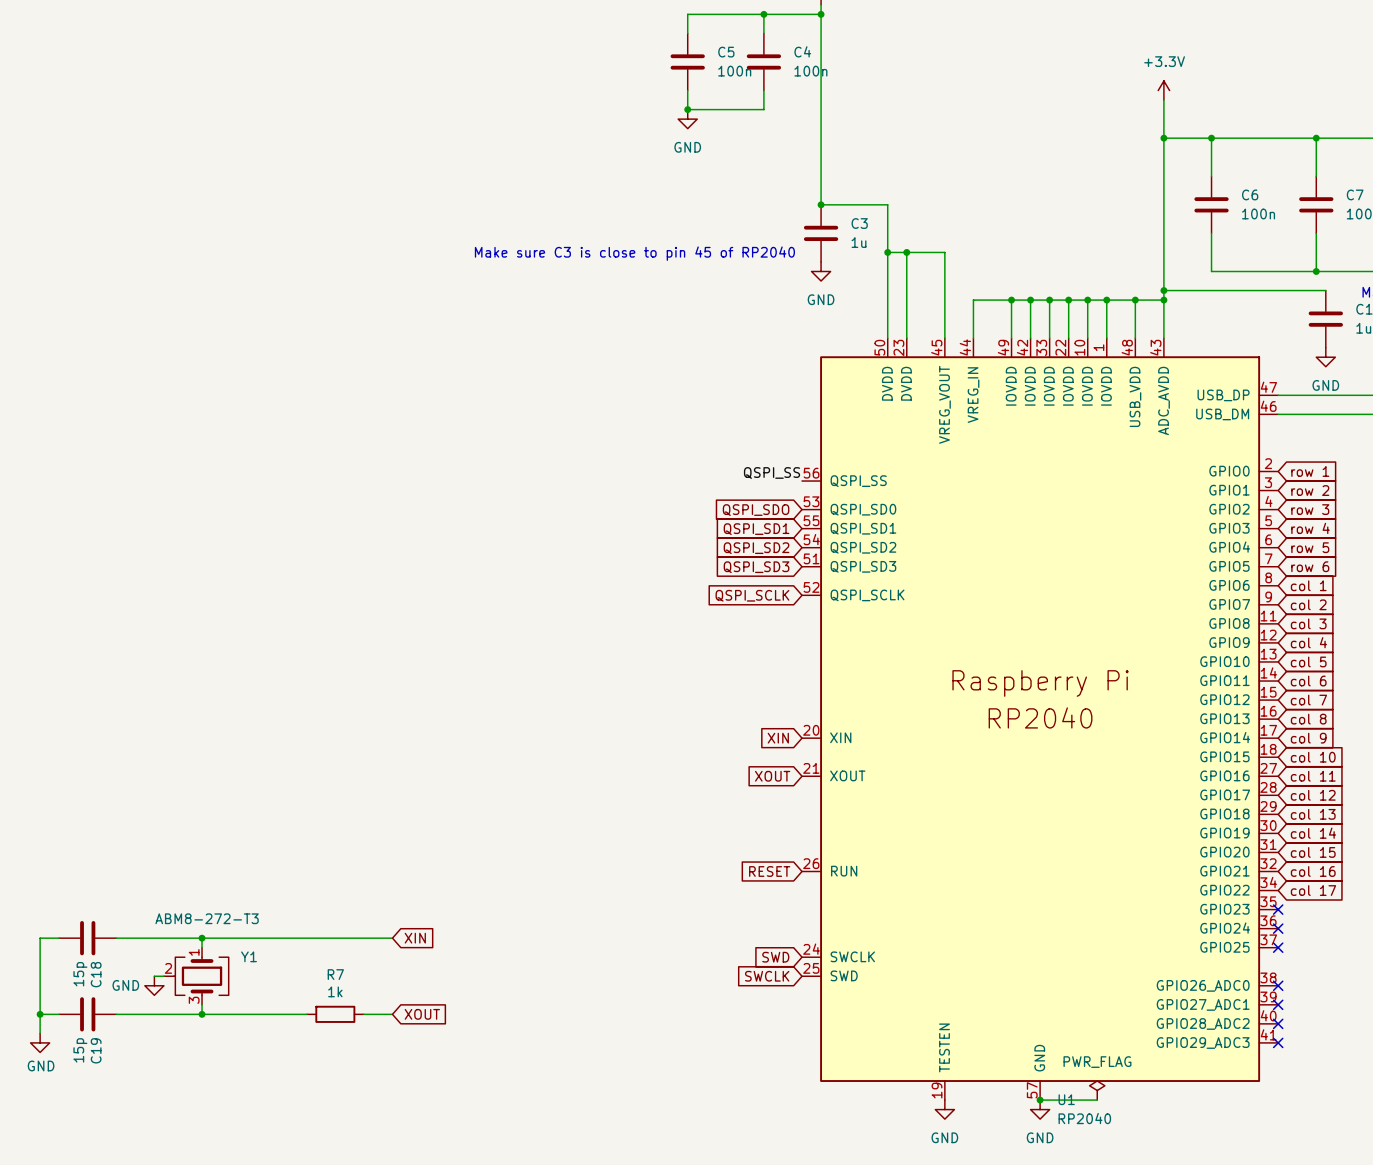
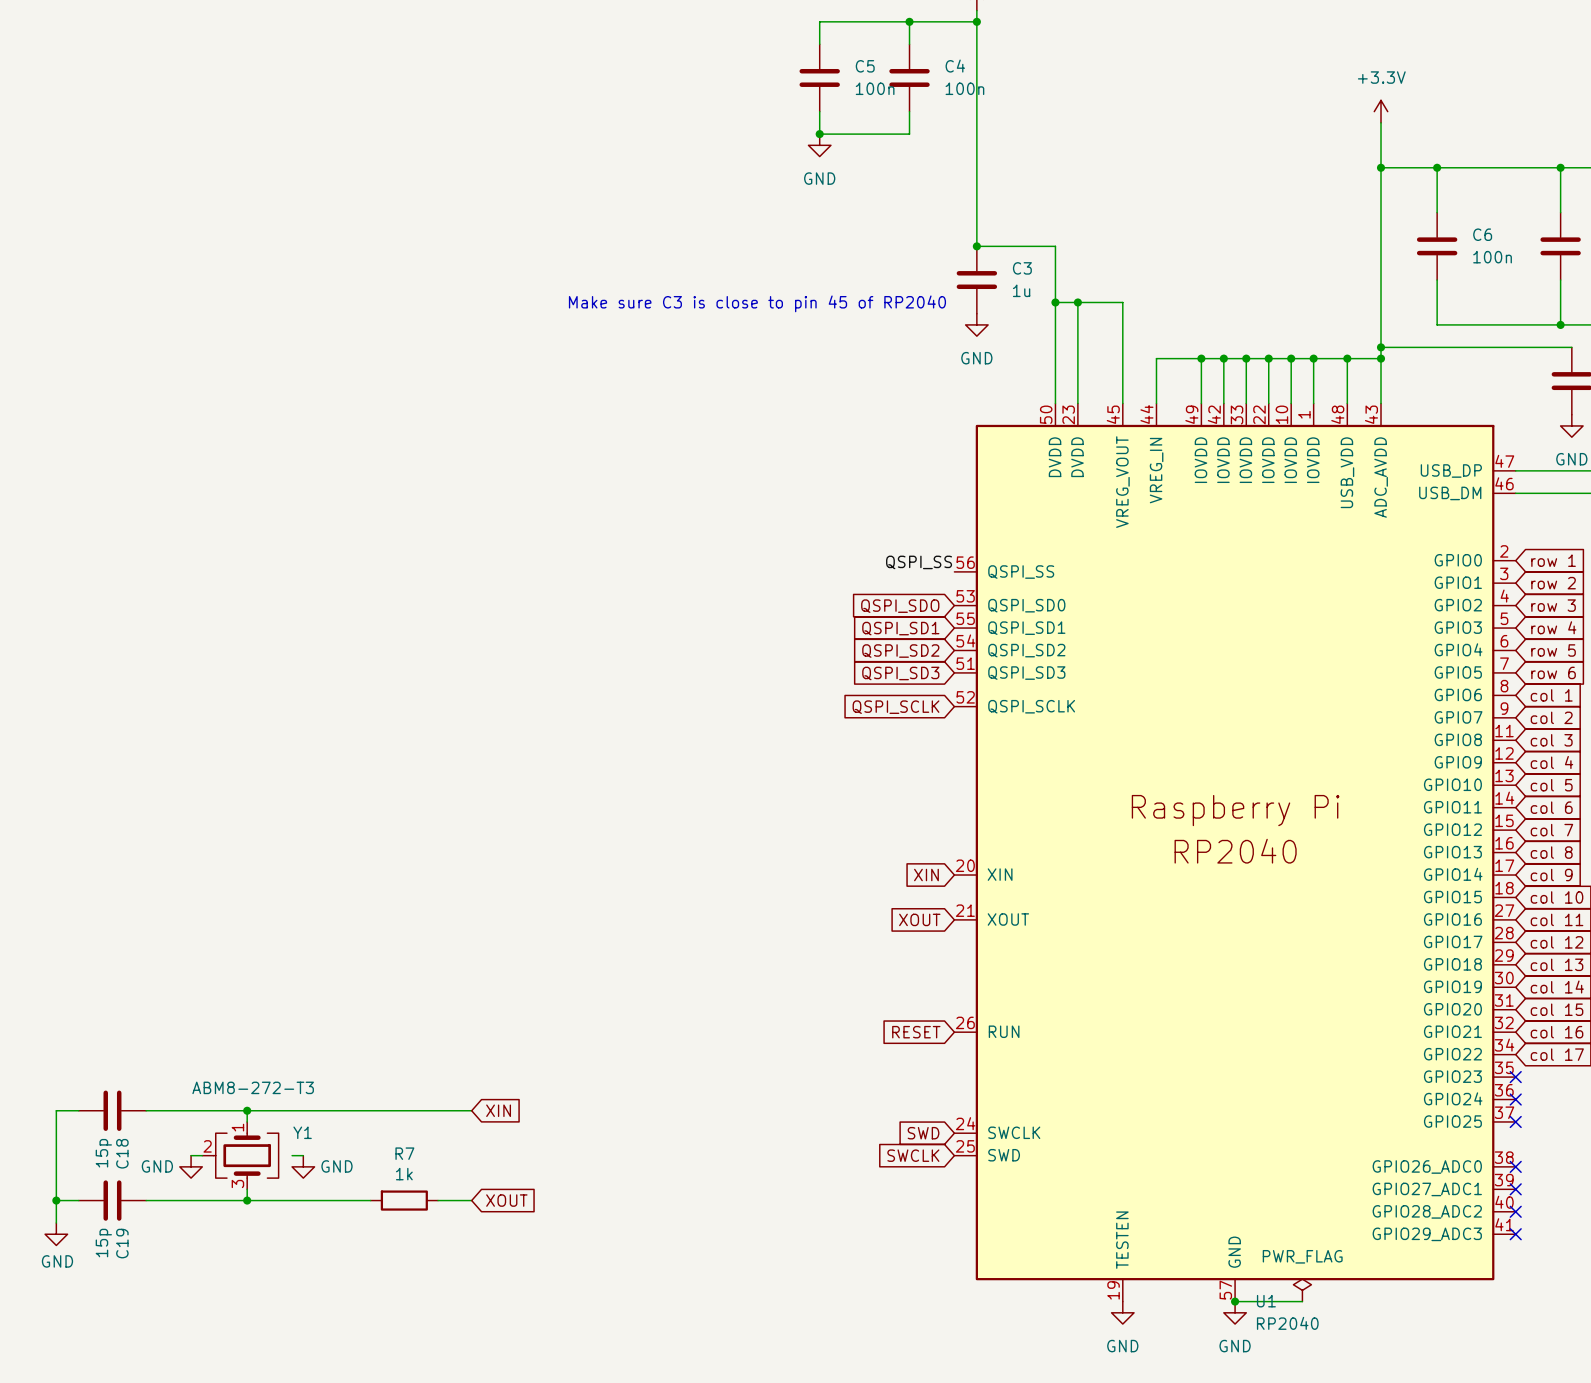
wire: none -> (292, 1155) (303, 1155)
power symbol: none -> GND (303, 1166)

